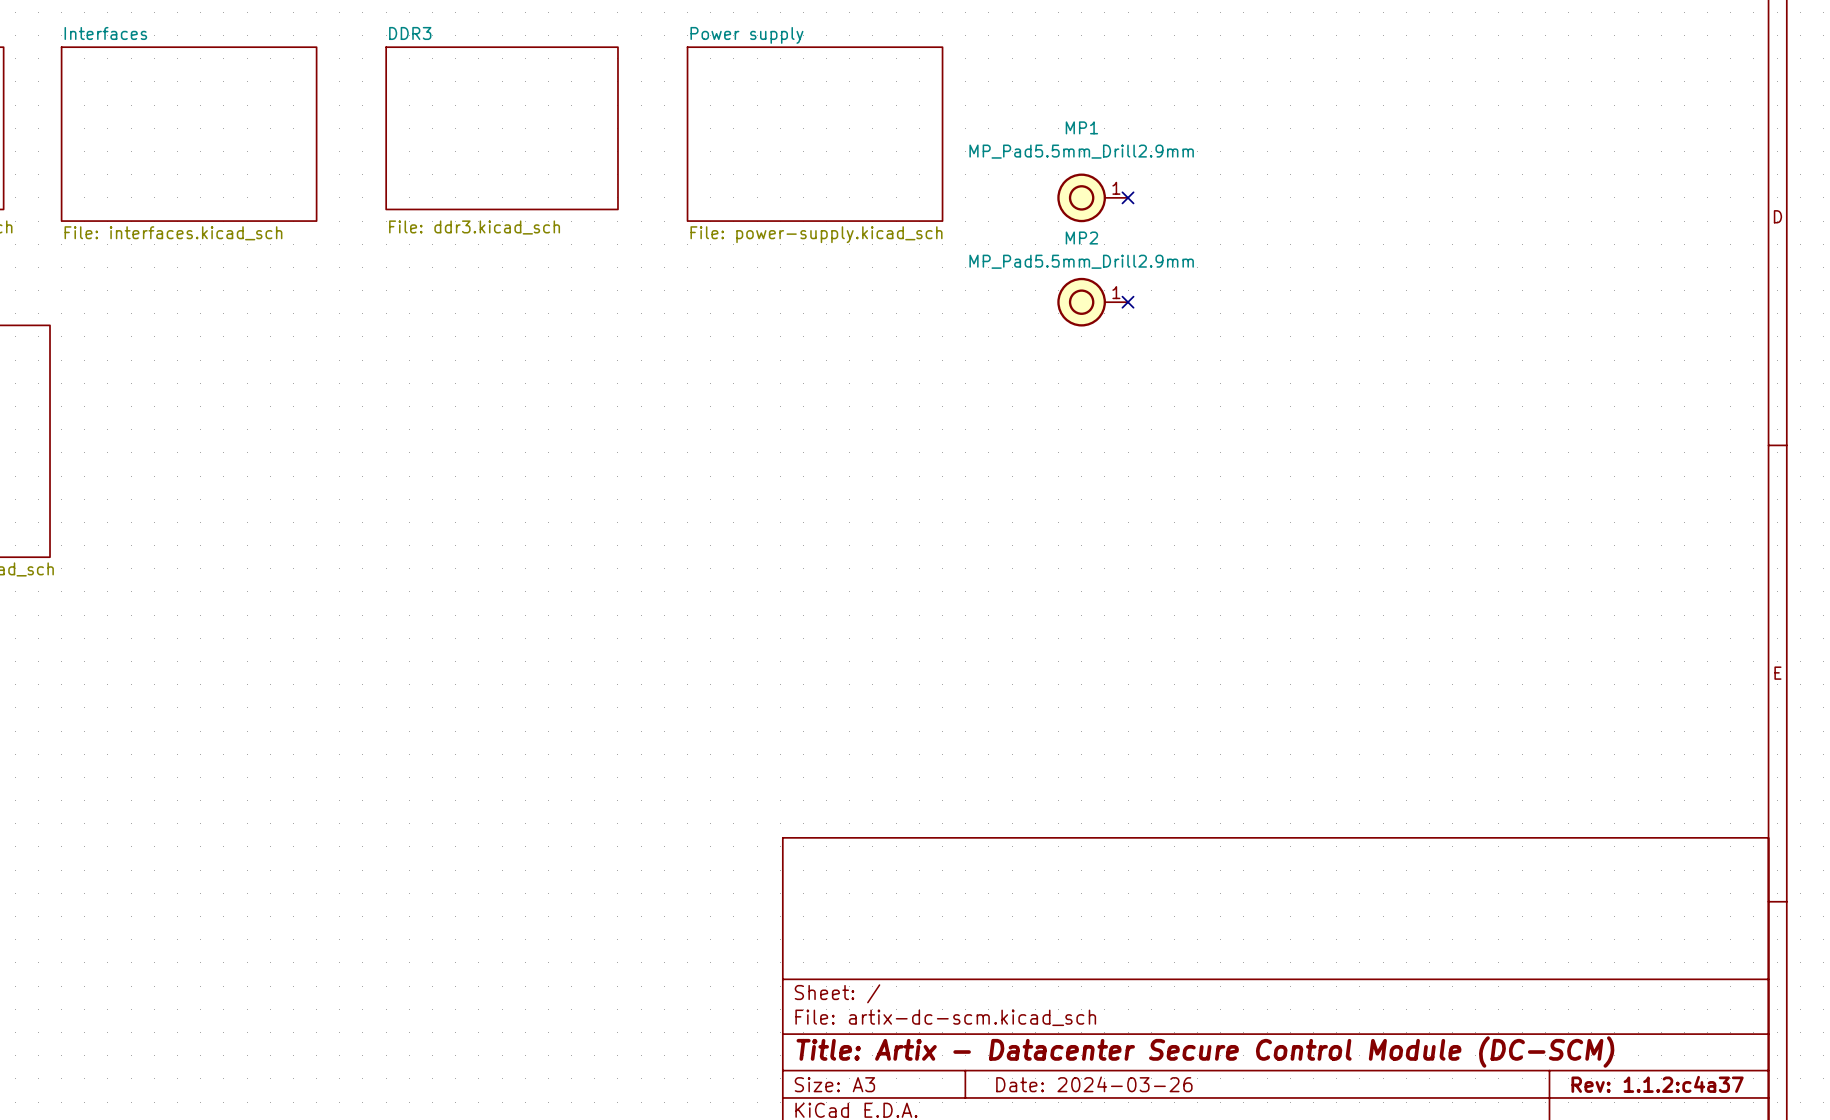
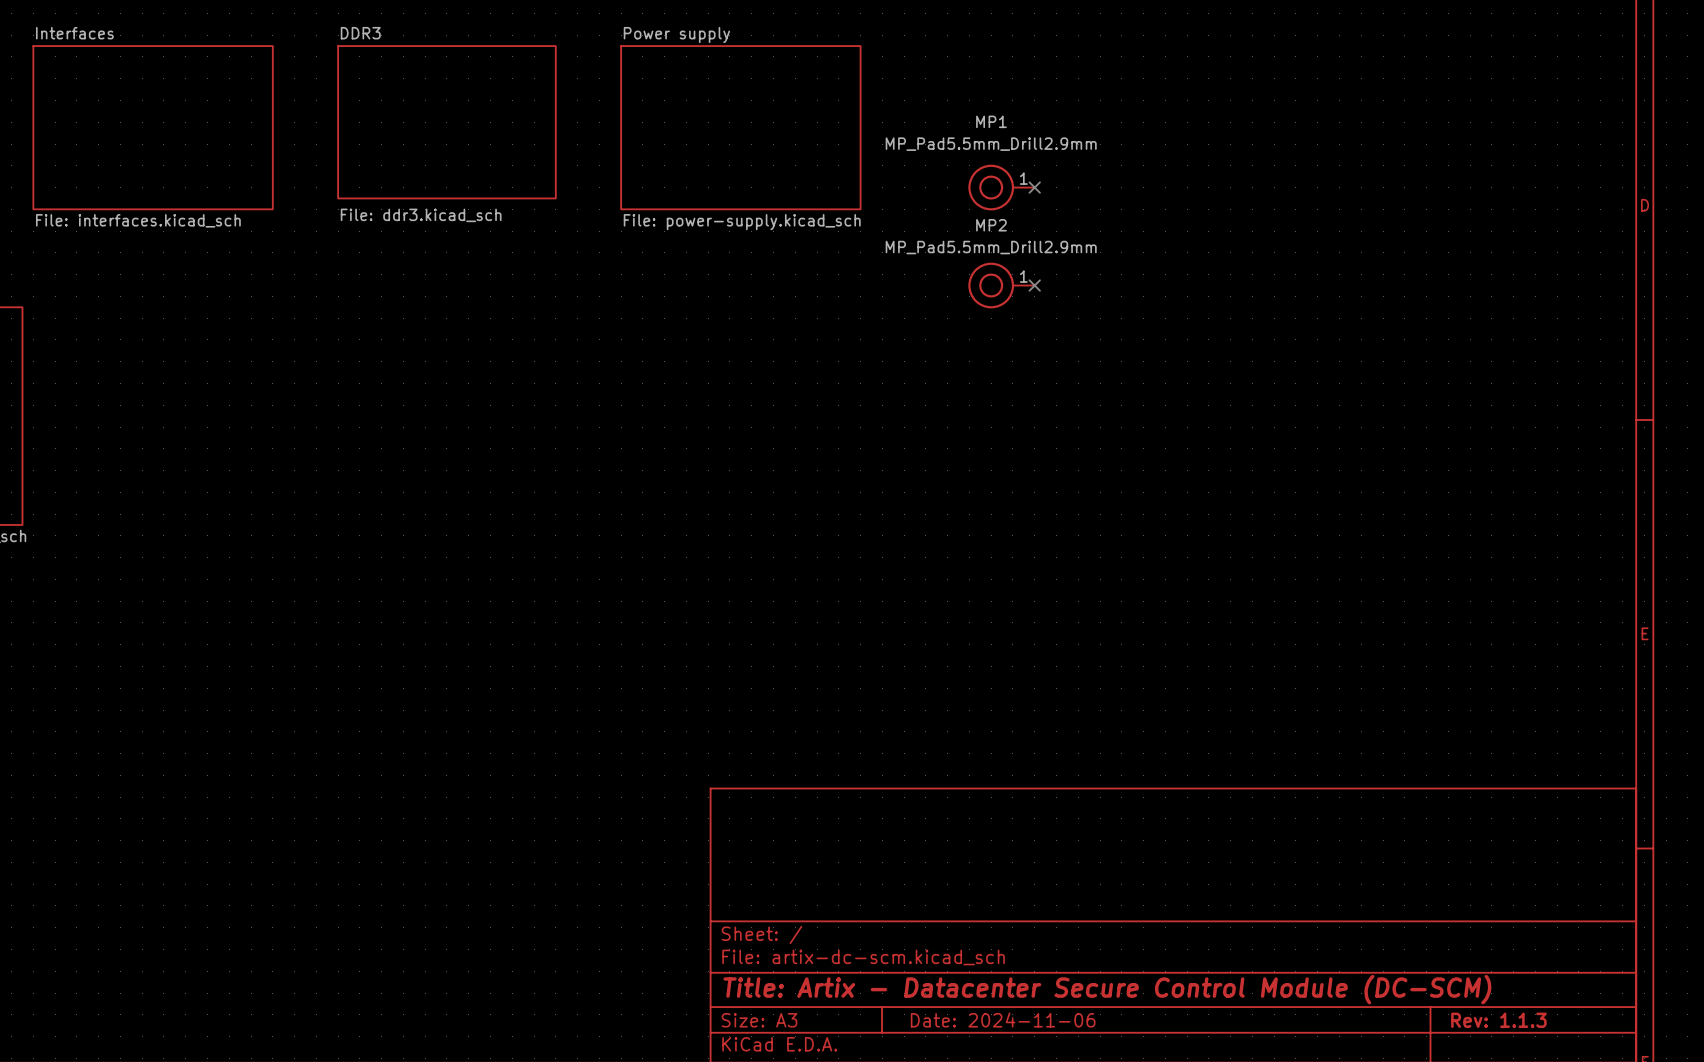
title block: Date: 2024-03-26 (1094, 1084) -> Date: 2024-11-06 (1003, 1019)
title block: Rev: 1.1.2:c4a37 (1657, 1084) -> Rev: 1.1.3 (1498, 1020)

